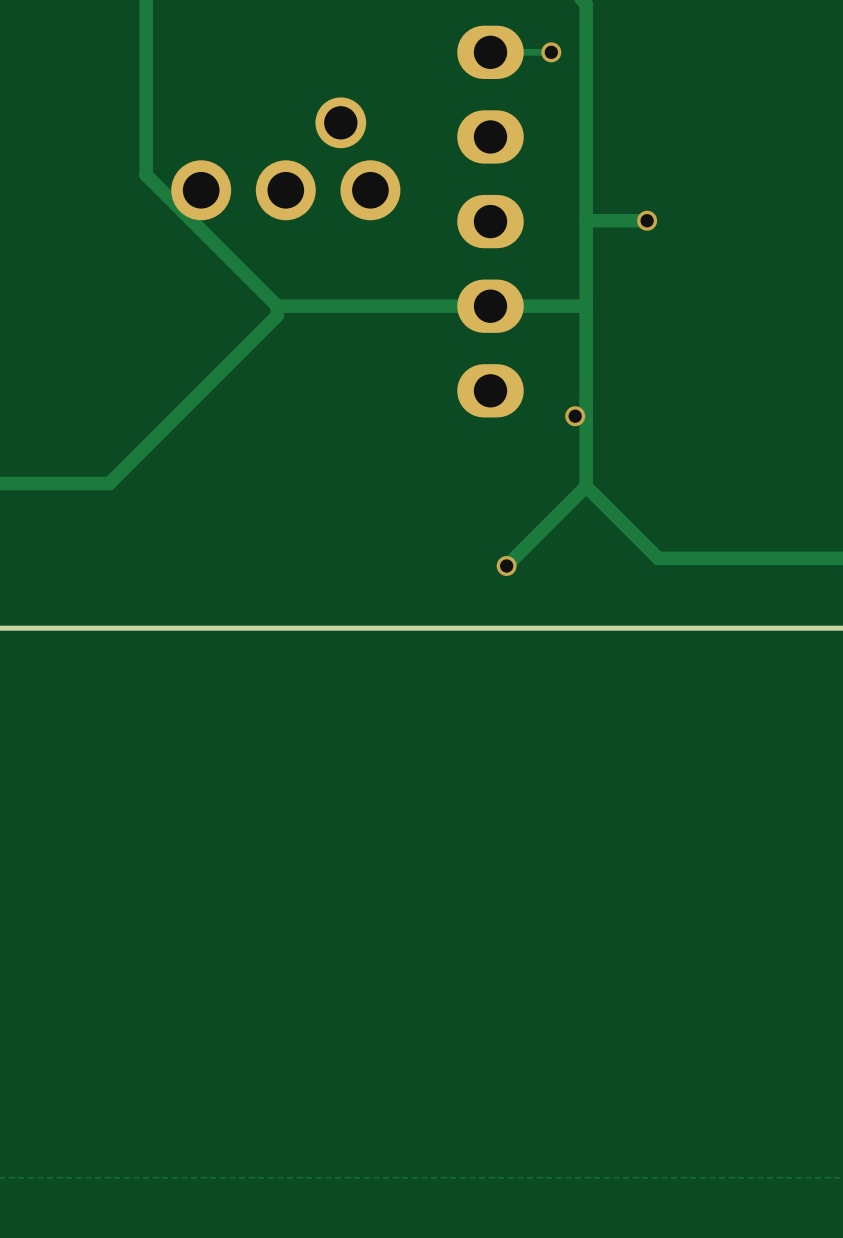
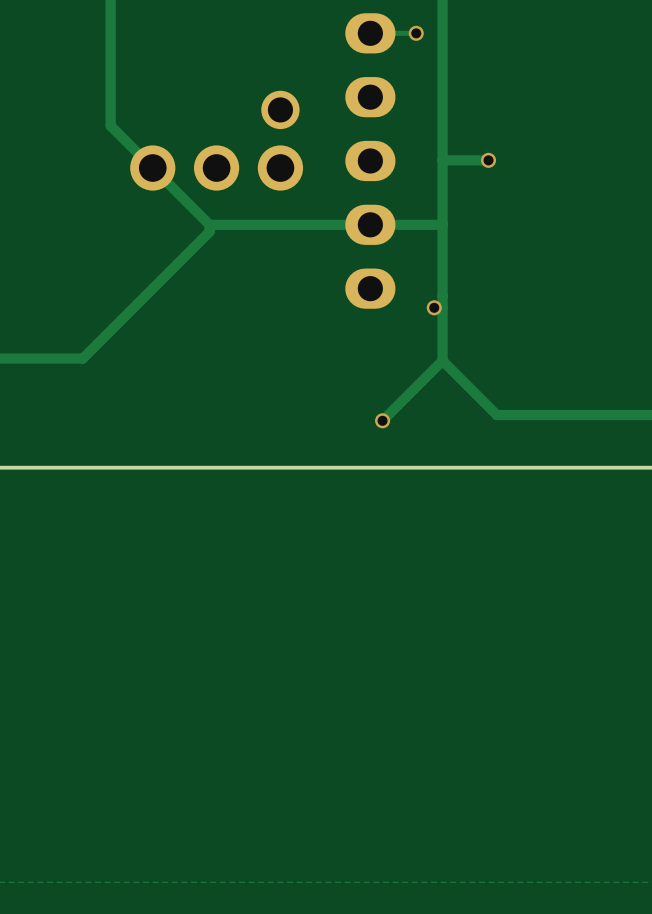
part position: (340, 122) -> (280, 109)
part position: (285, 190) -> (216, 168)

